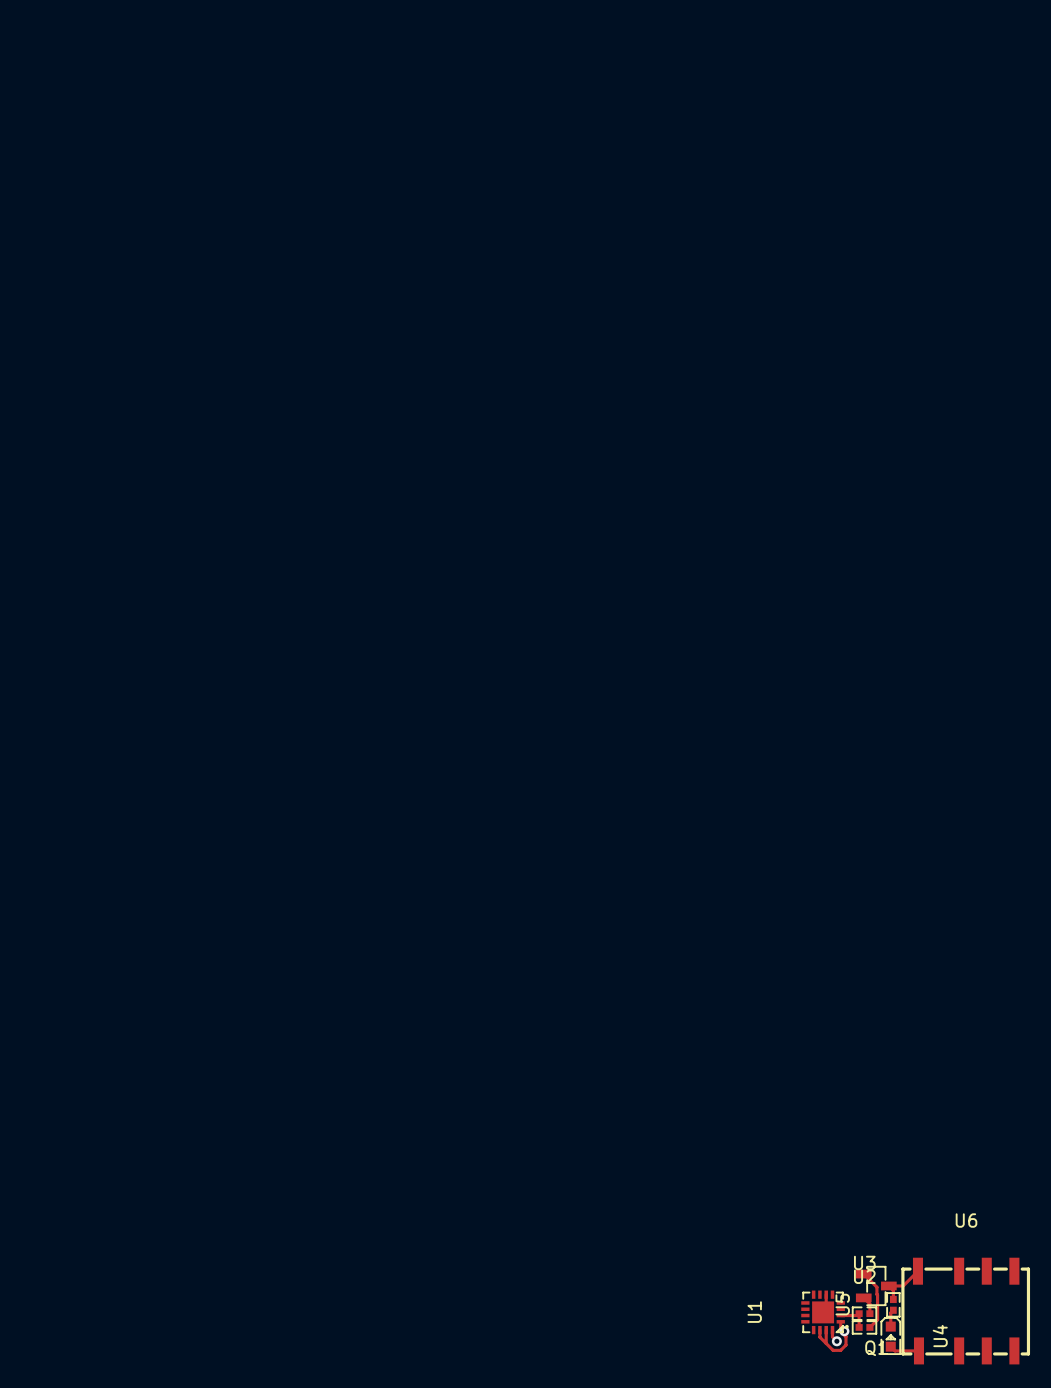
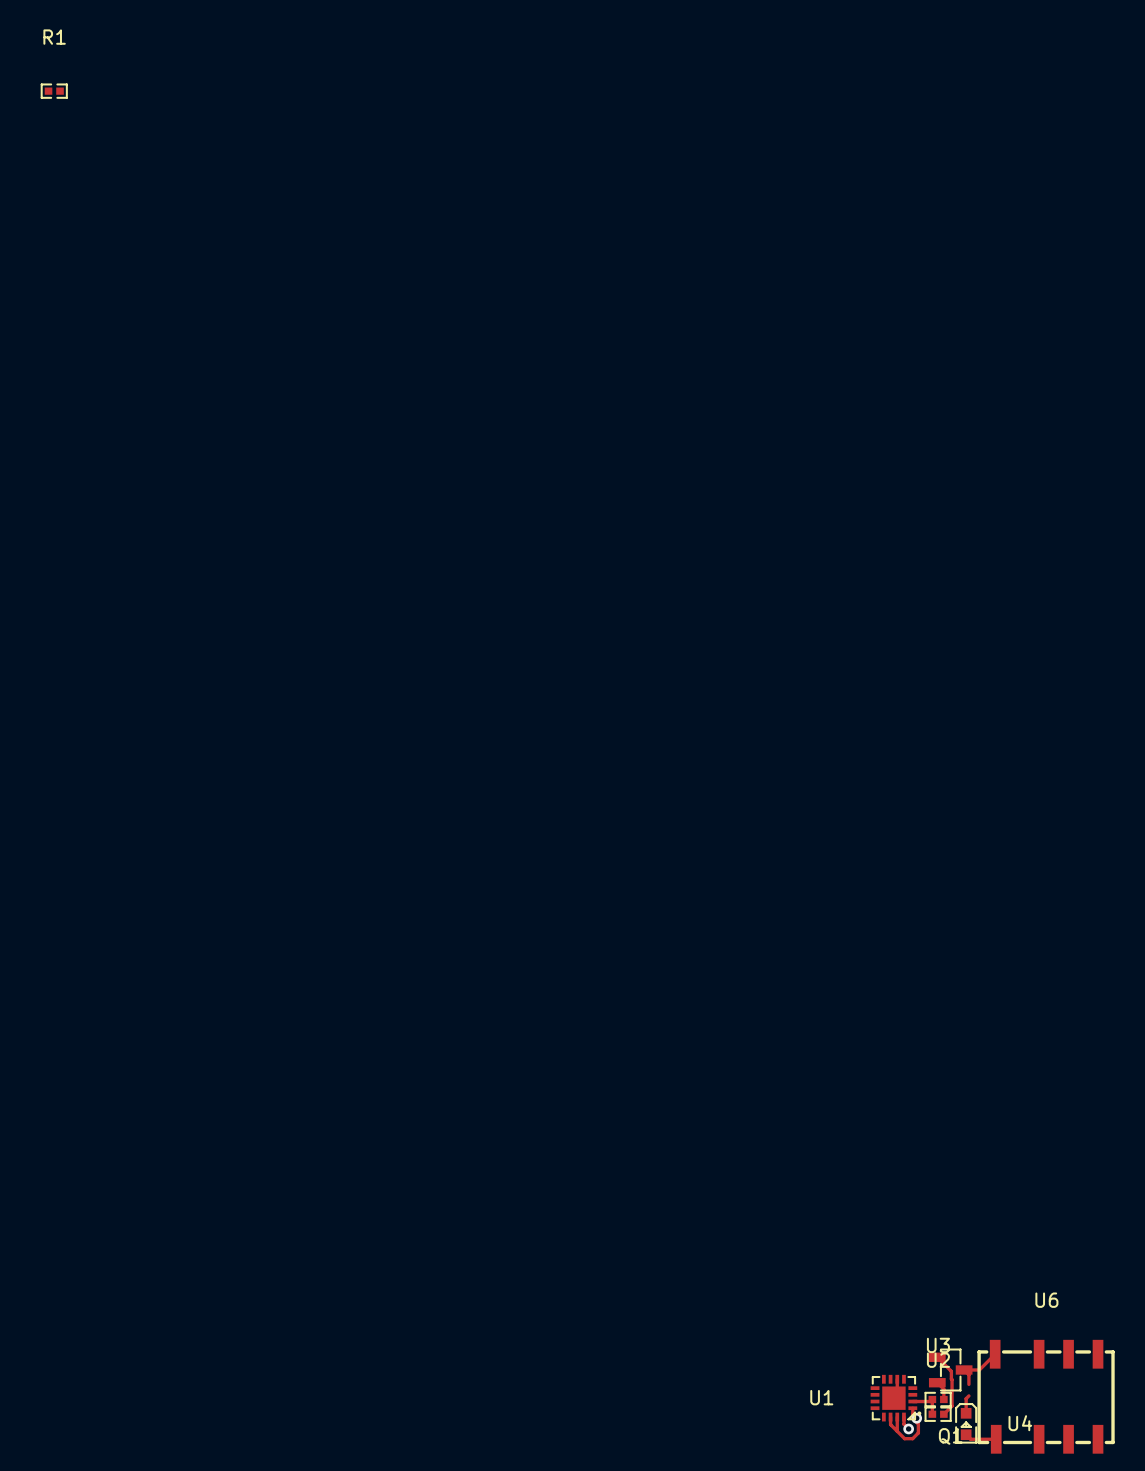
R1: none -> (54, 91)
U5: (893, 1304) -> none
U1 name rotation: 0° (754, 1312) -> 90° clockwise (821, 1397)
U4 name rotation: 0° (940, 1336) -> 90° clockwise (1020, 1423)

